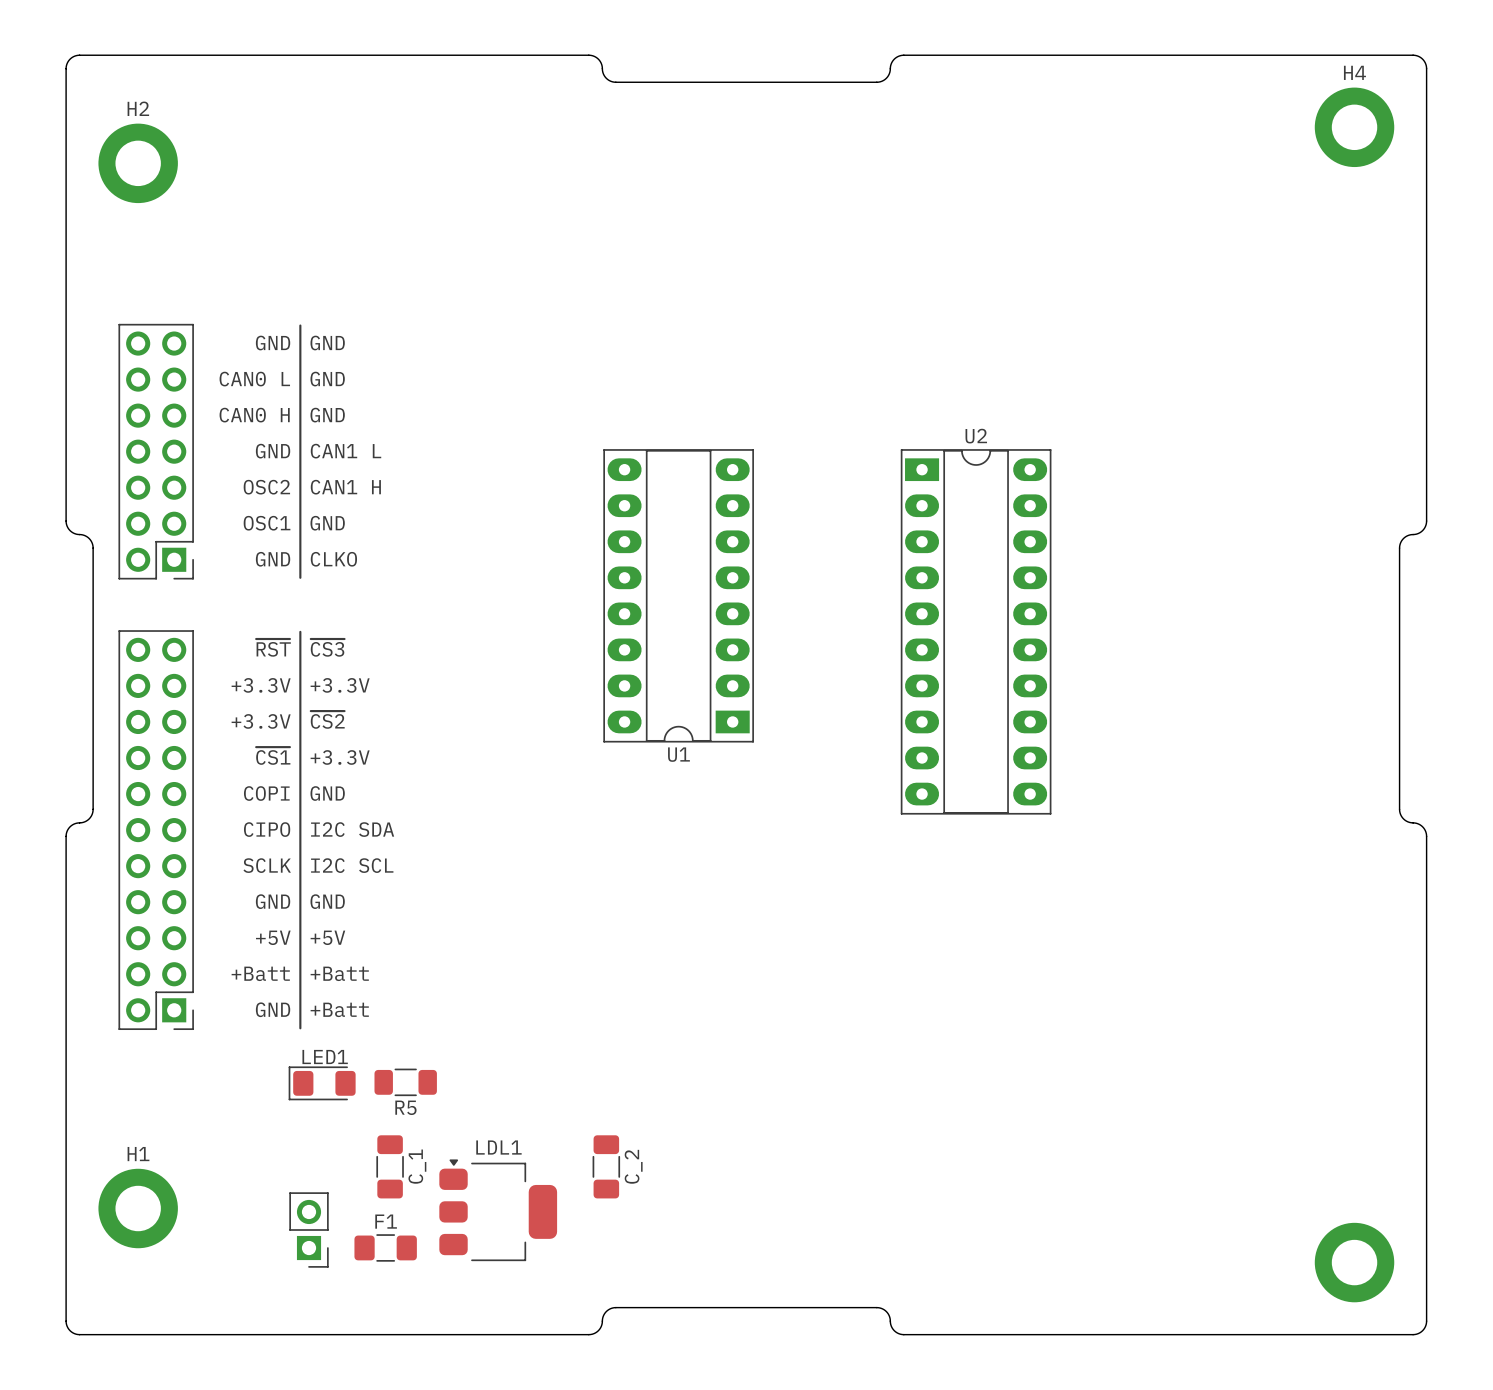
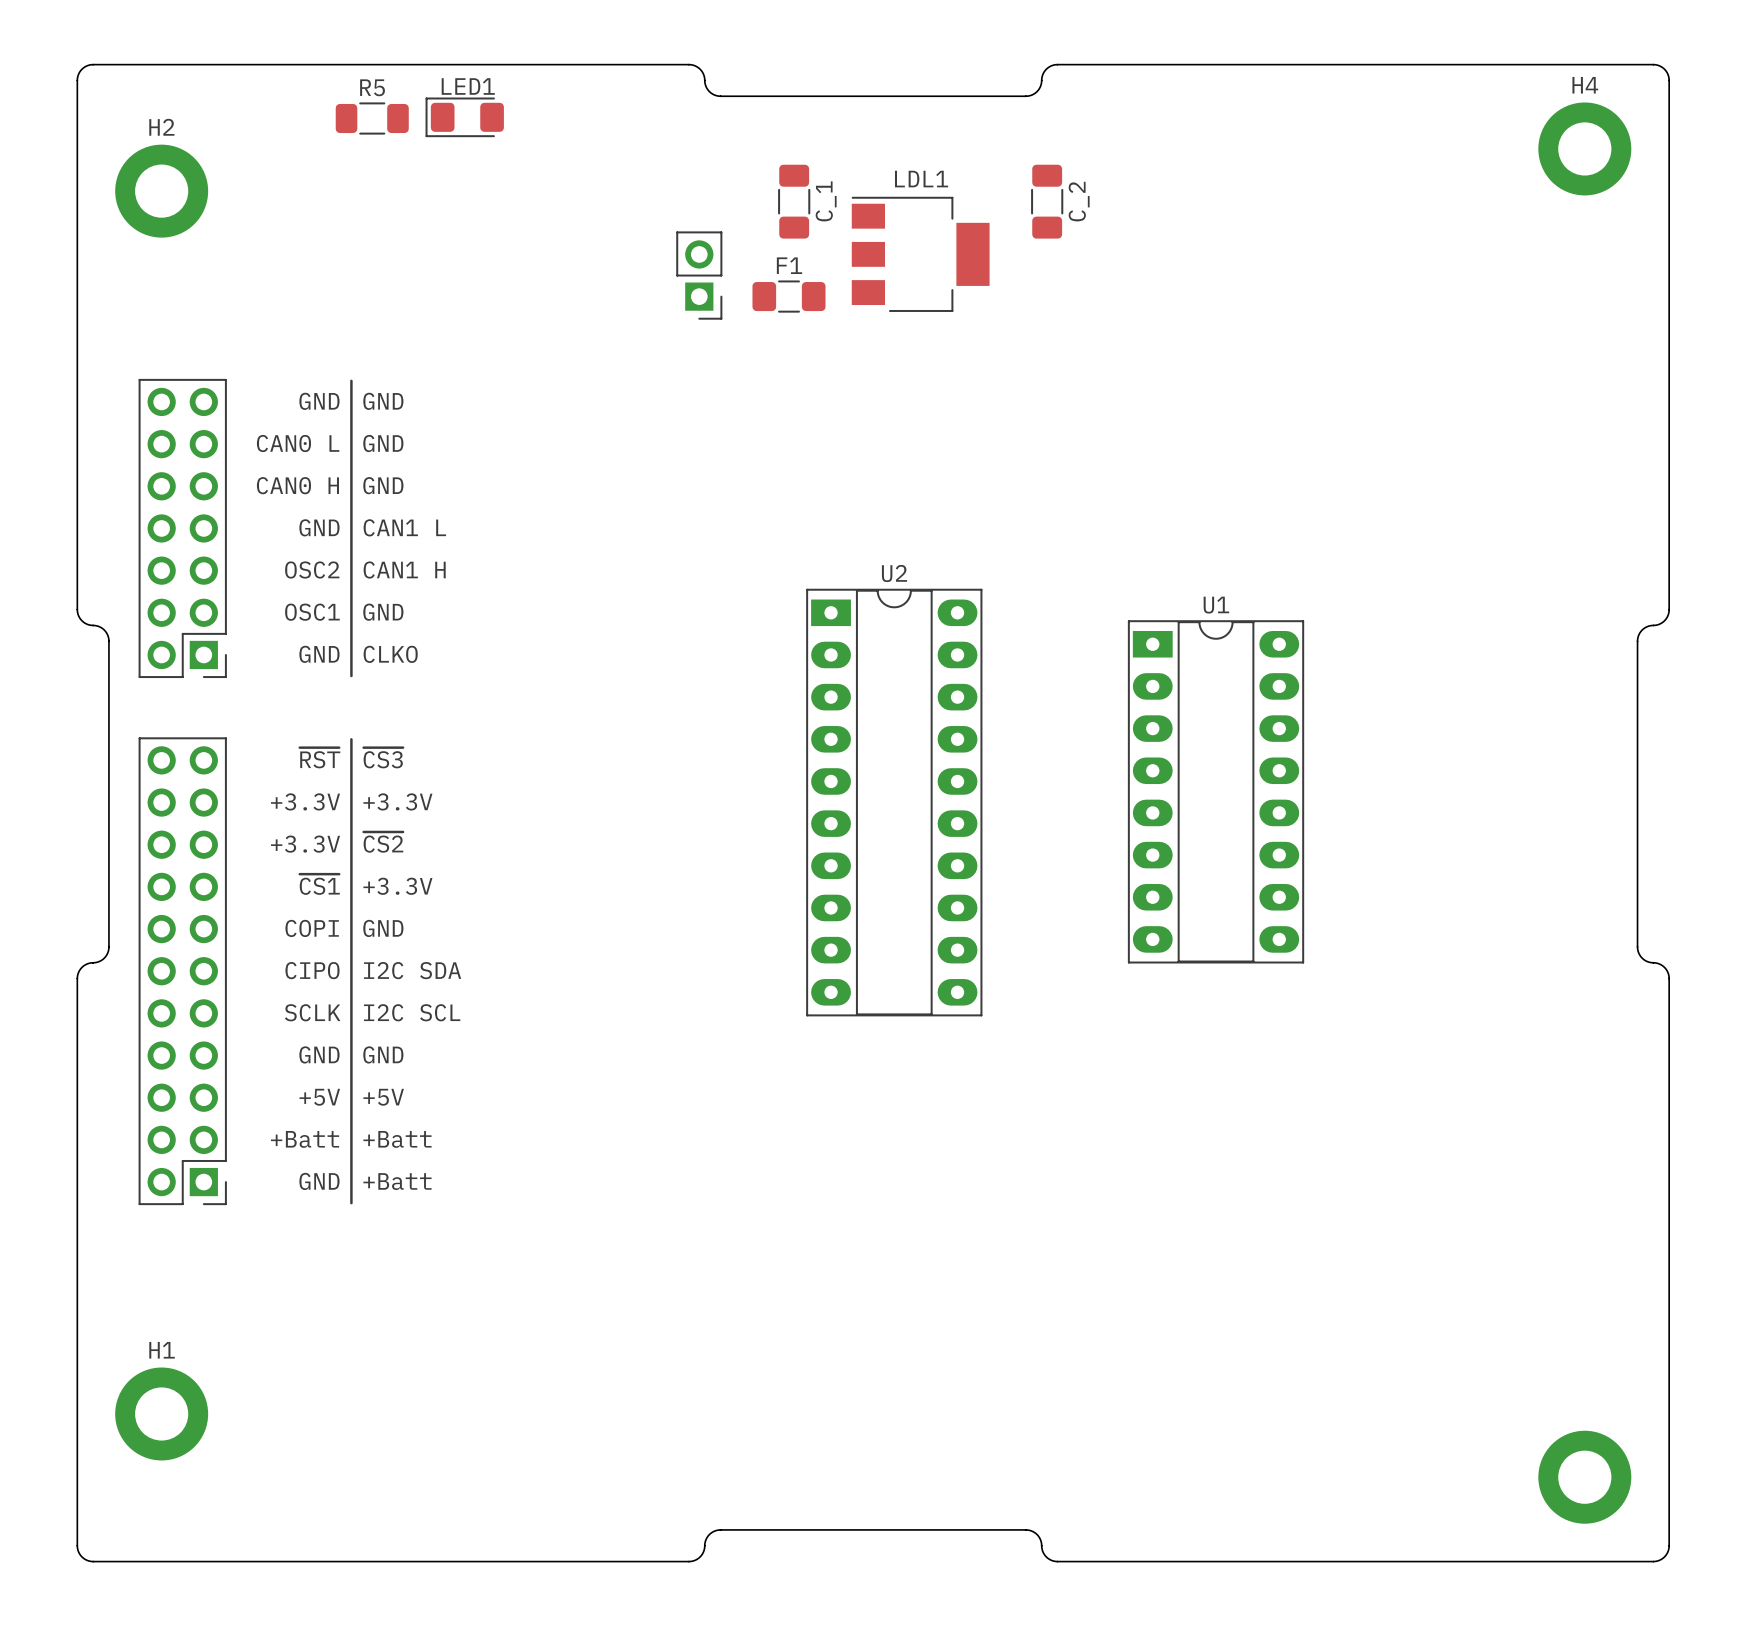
part: none -> (699, 275)
U1 rotation: 0° (678, 595) -> 180° (1216, 791)
U1 position: (678, 595) -> (1216, 791)
U2 position: (976, 631) -> (894, 802)
R5 position: (405, 1082) -> (372, 118)
LED1 position: (322, 1083) -> (464, 117)
R5 name position: R5 (405, 1107) -> R5 (372, 87)
LDL1 footprint: [439, 1159, 558, 1262] -> [851, 196, 990, 312]
C_1 position: (390, 1166) -> (794, 201)
C_2 position: (606, 1166) -> (1047, 201)
part: (309, 1230) -> none
F1 position: (385, 1247) -> (788, 296)

